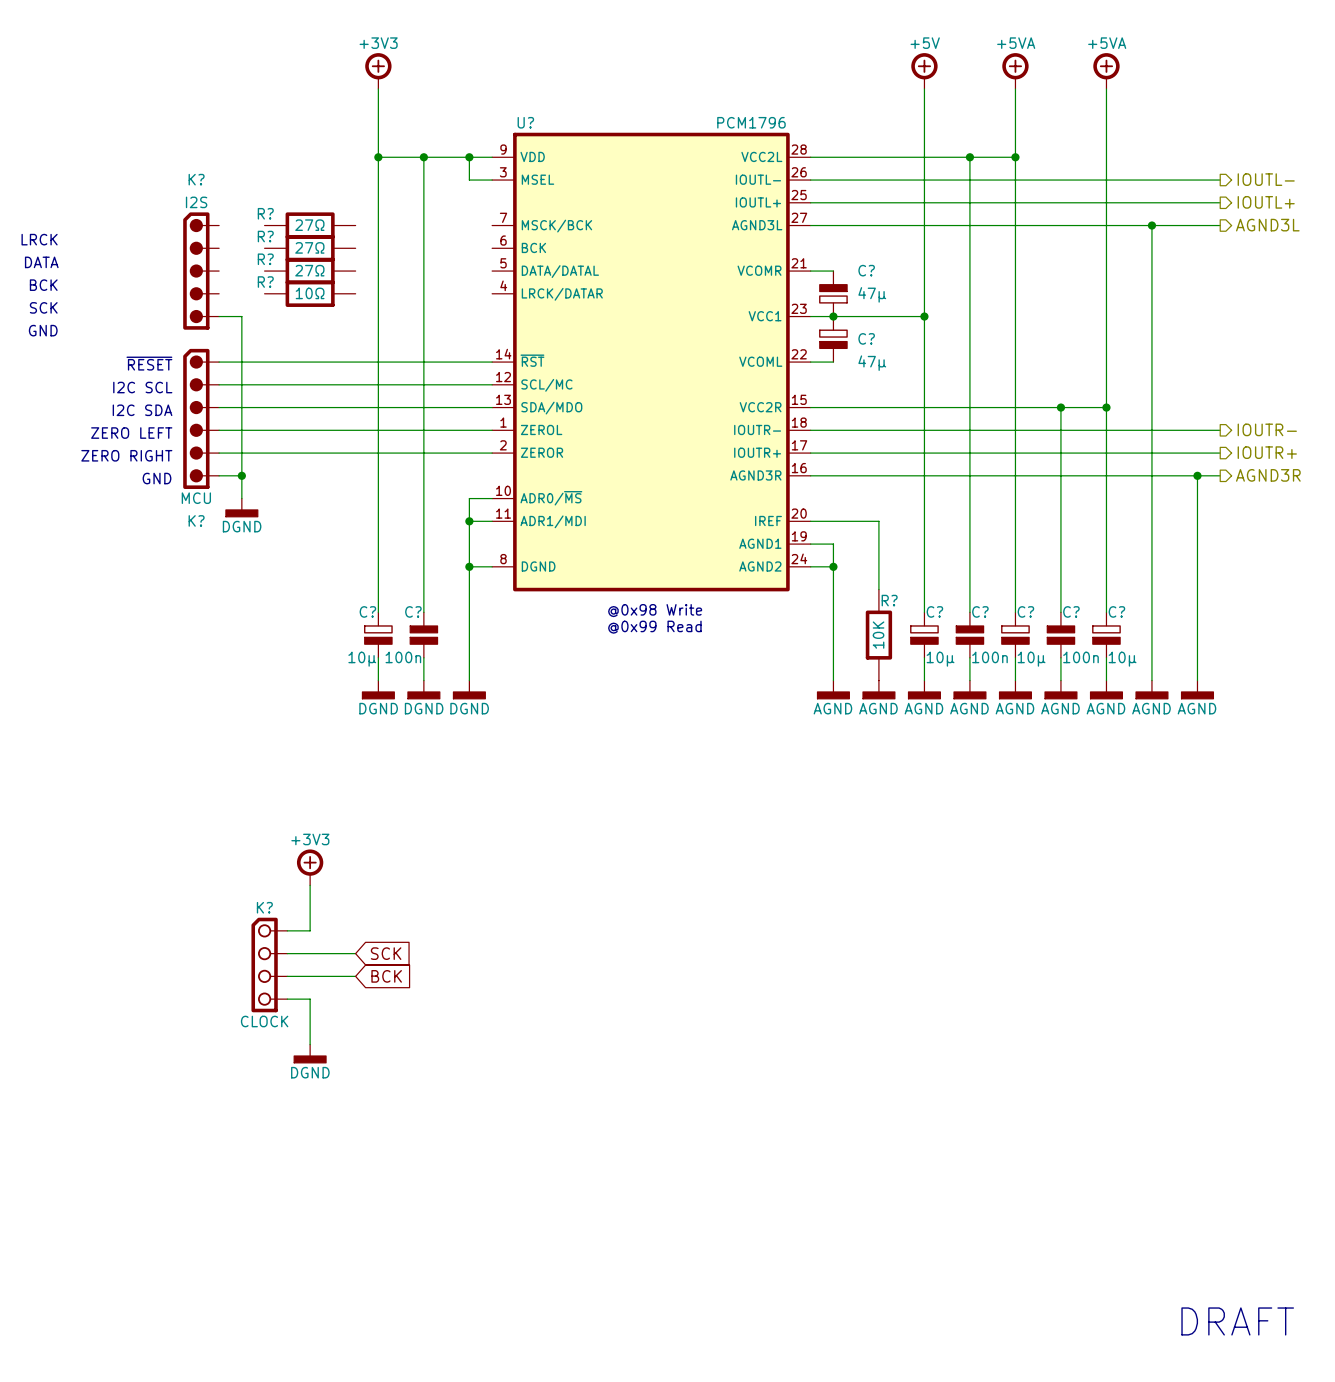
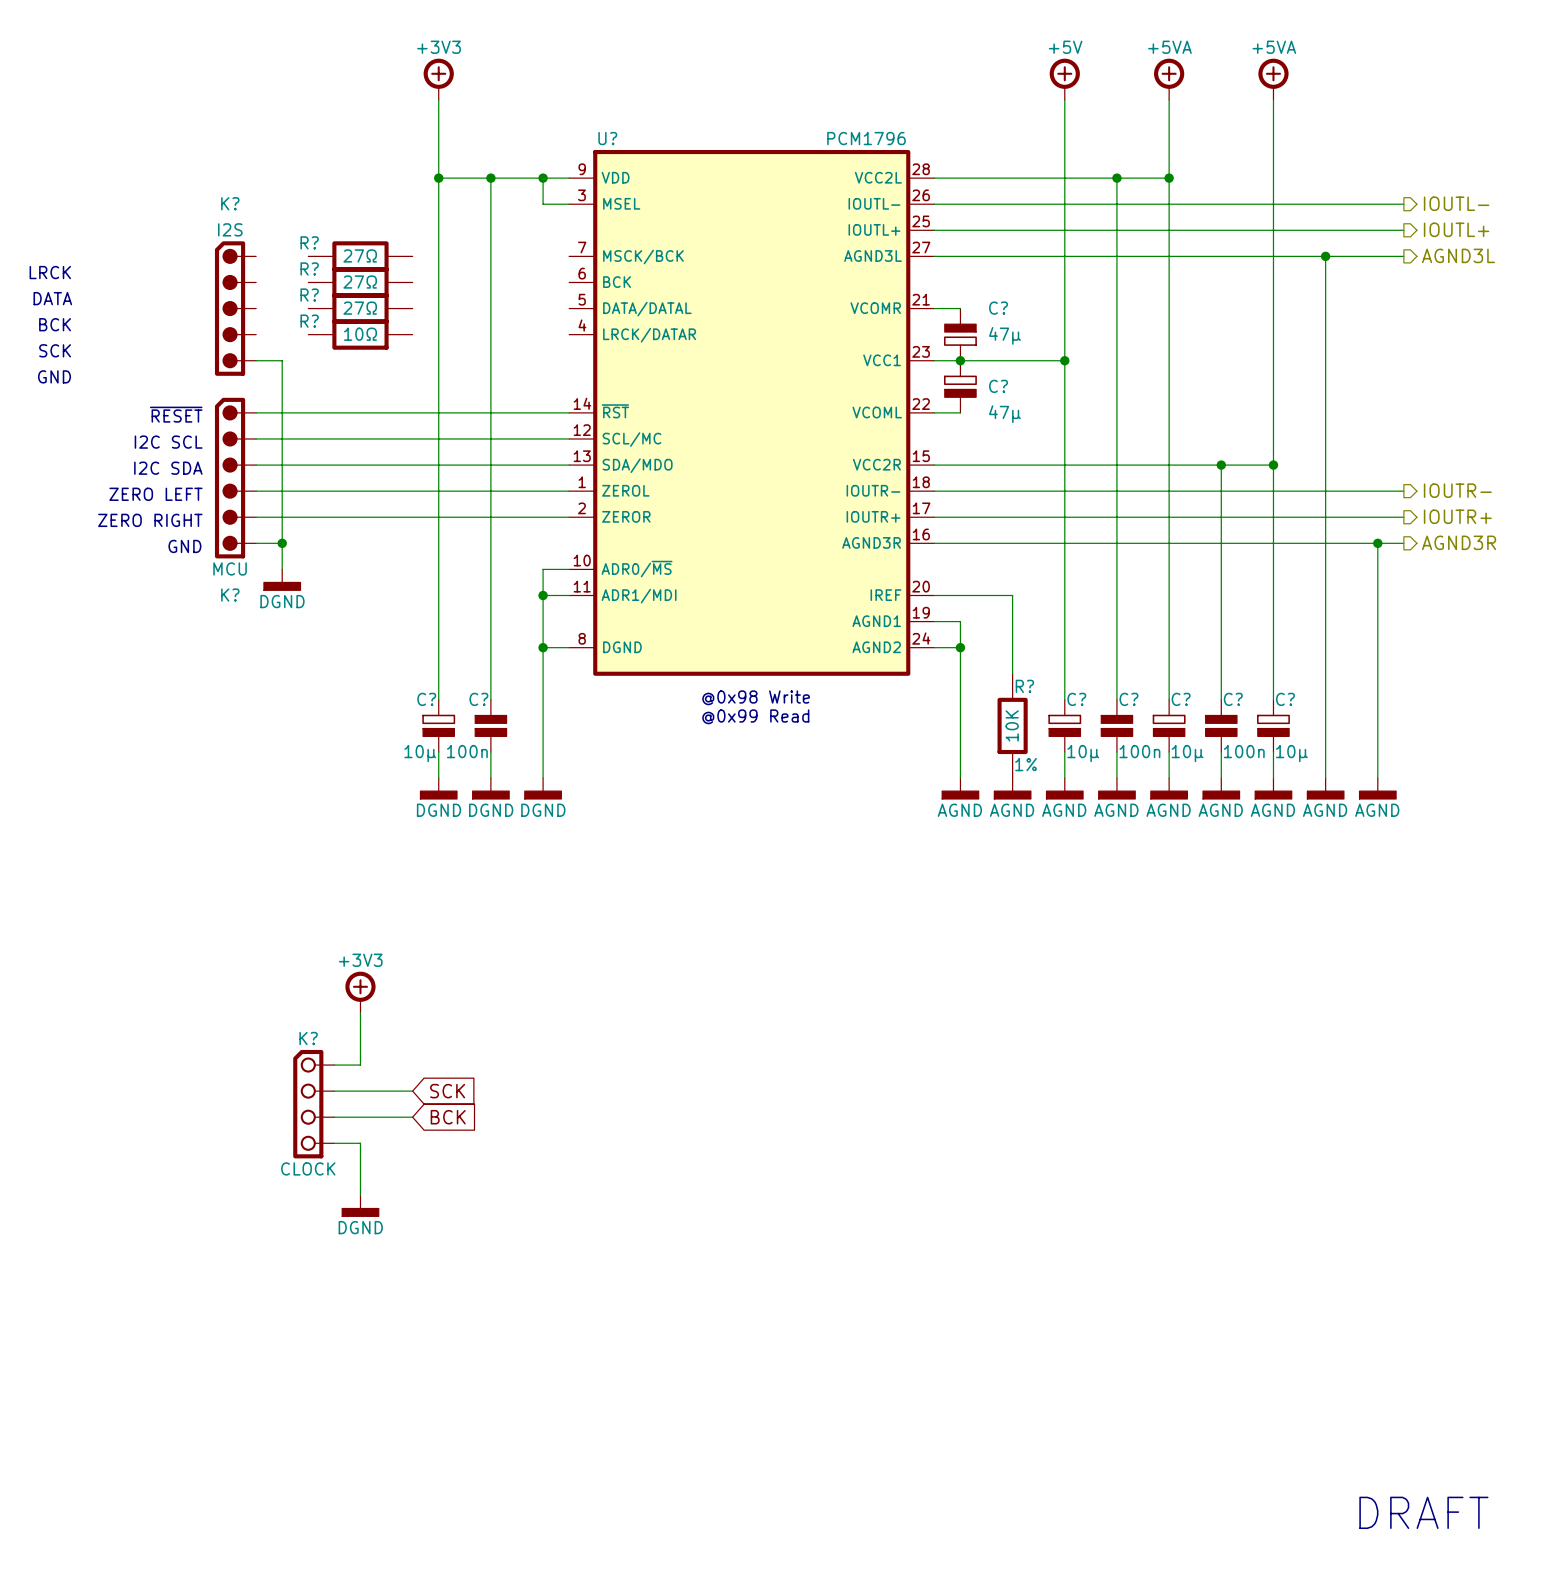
R? text: none -> 1% (1026, 764)

